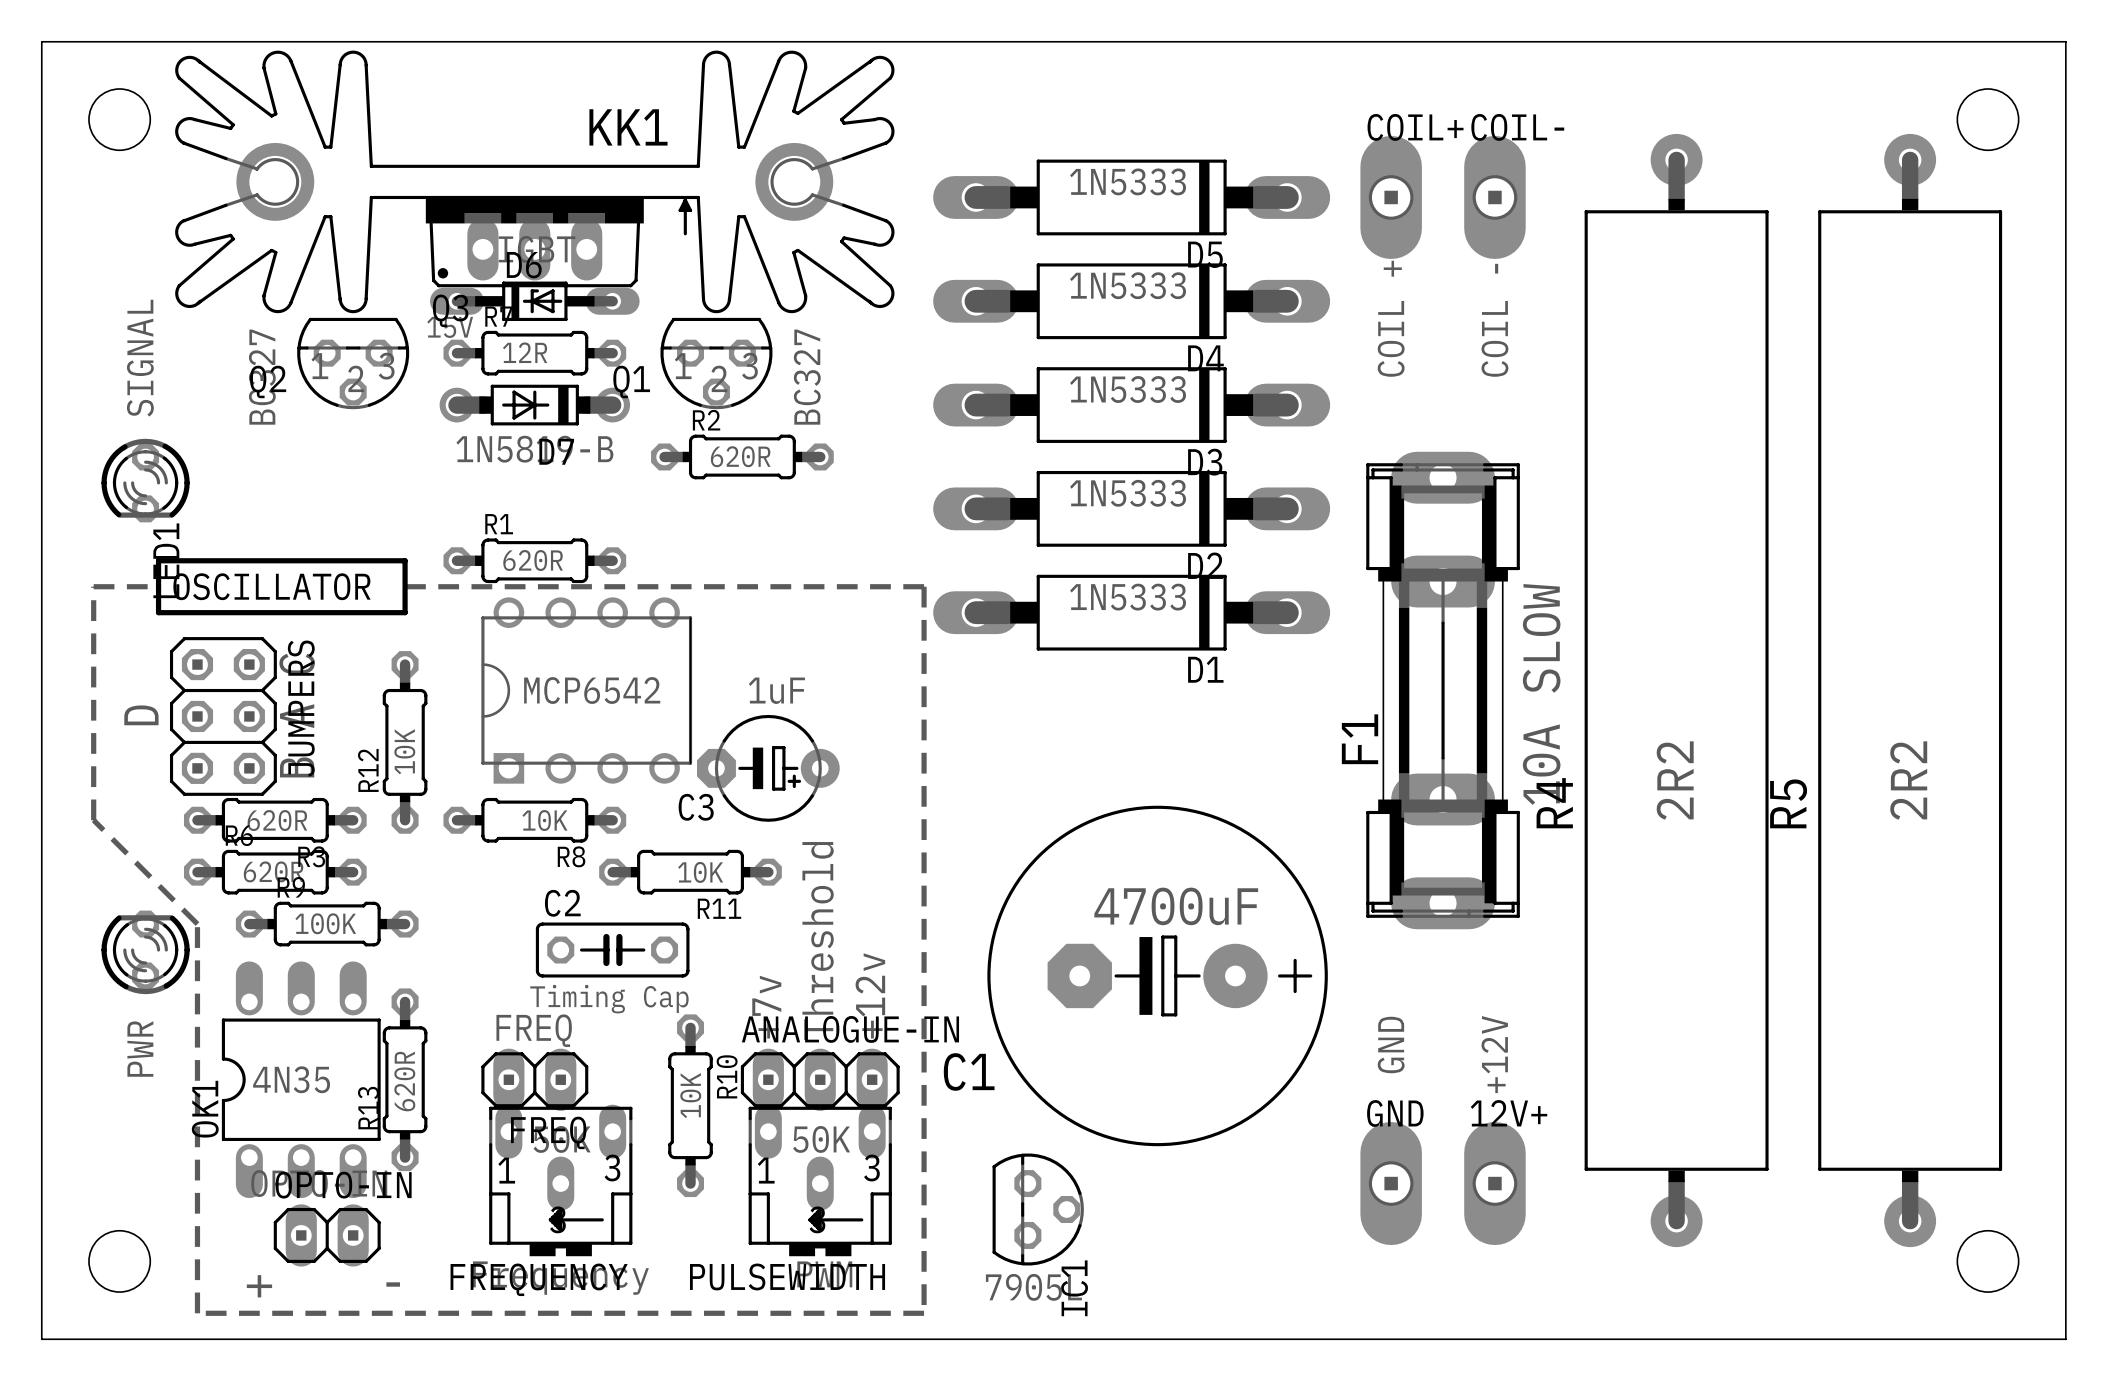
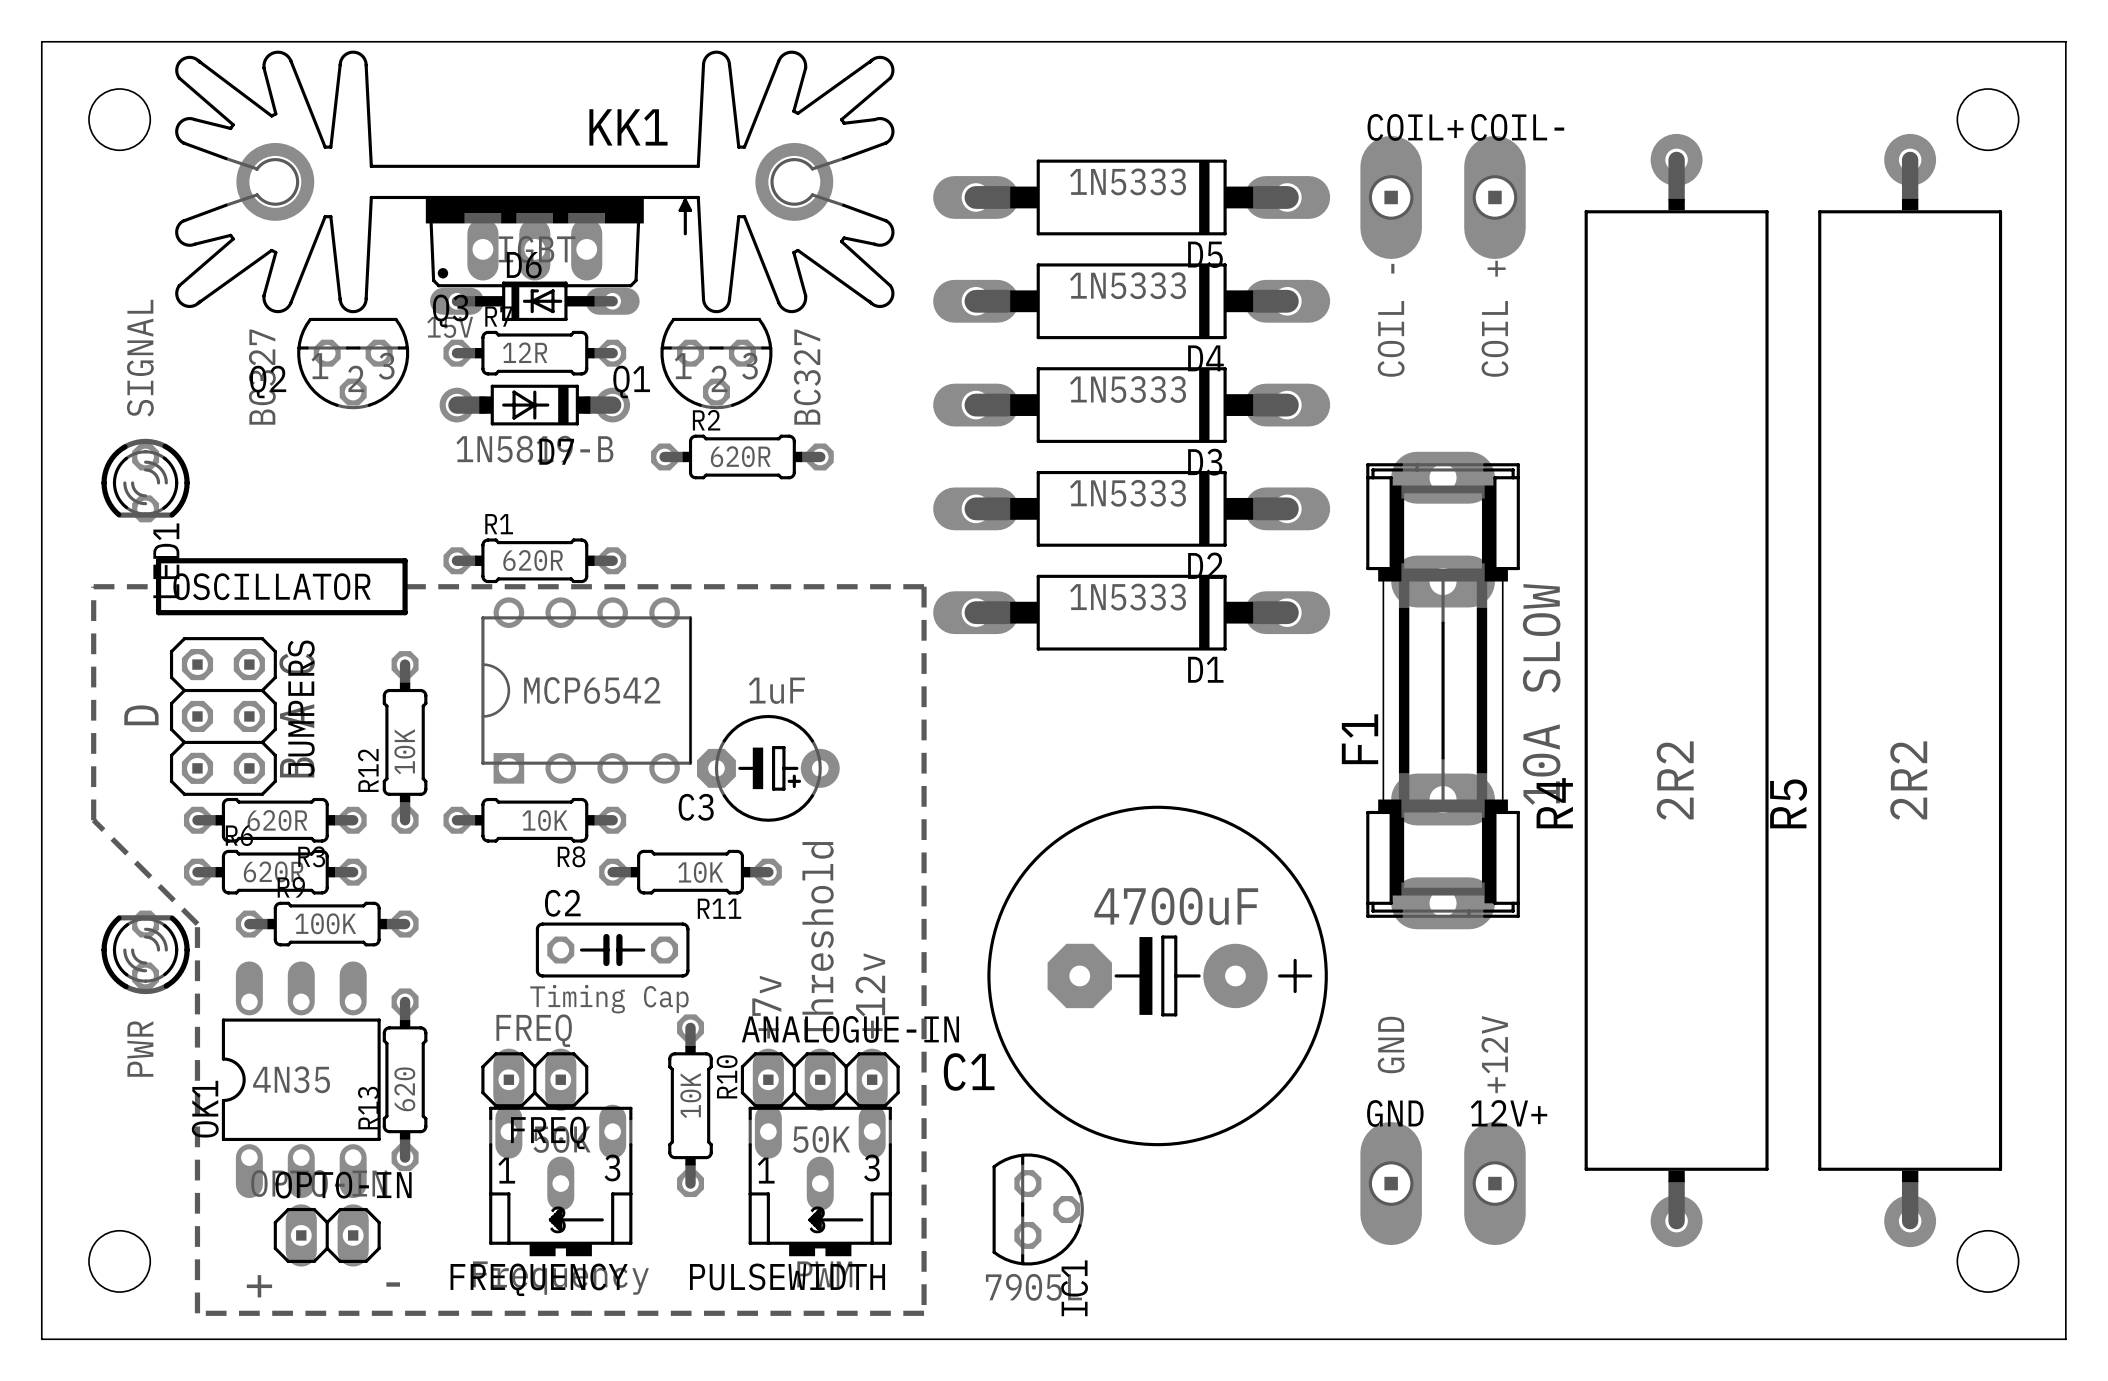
text: COIL + (1391, 318) -> COIL - (1391, 320)
text: COIL - (1494, 320) -> COIL + (1494, 318)
R13 value: 620R (404, 1081) -> 620 (404, 1089)

